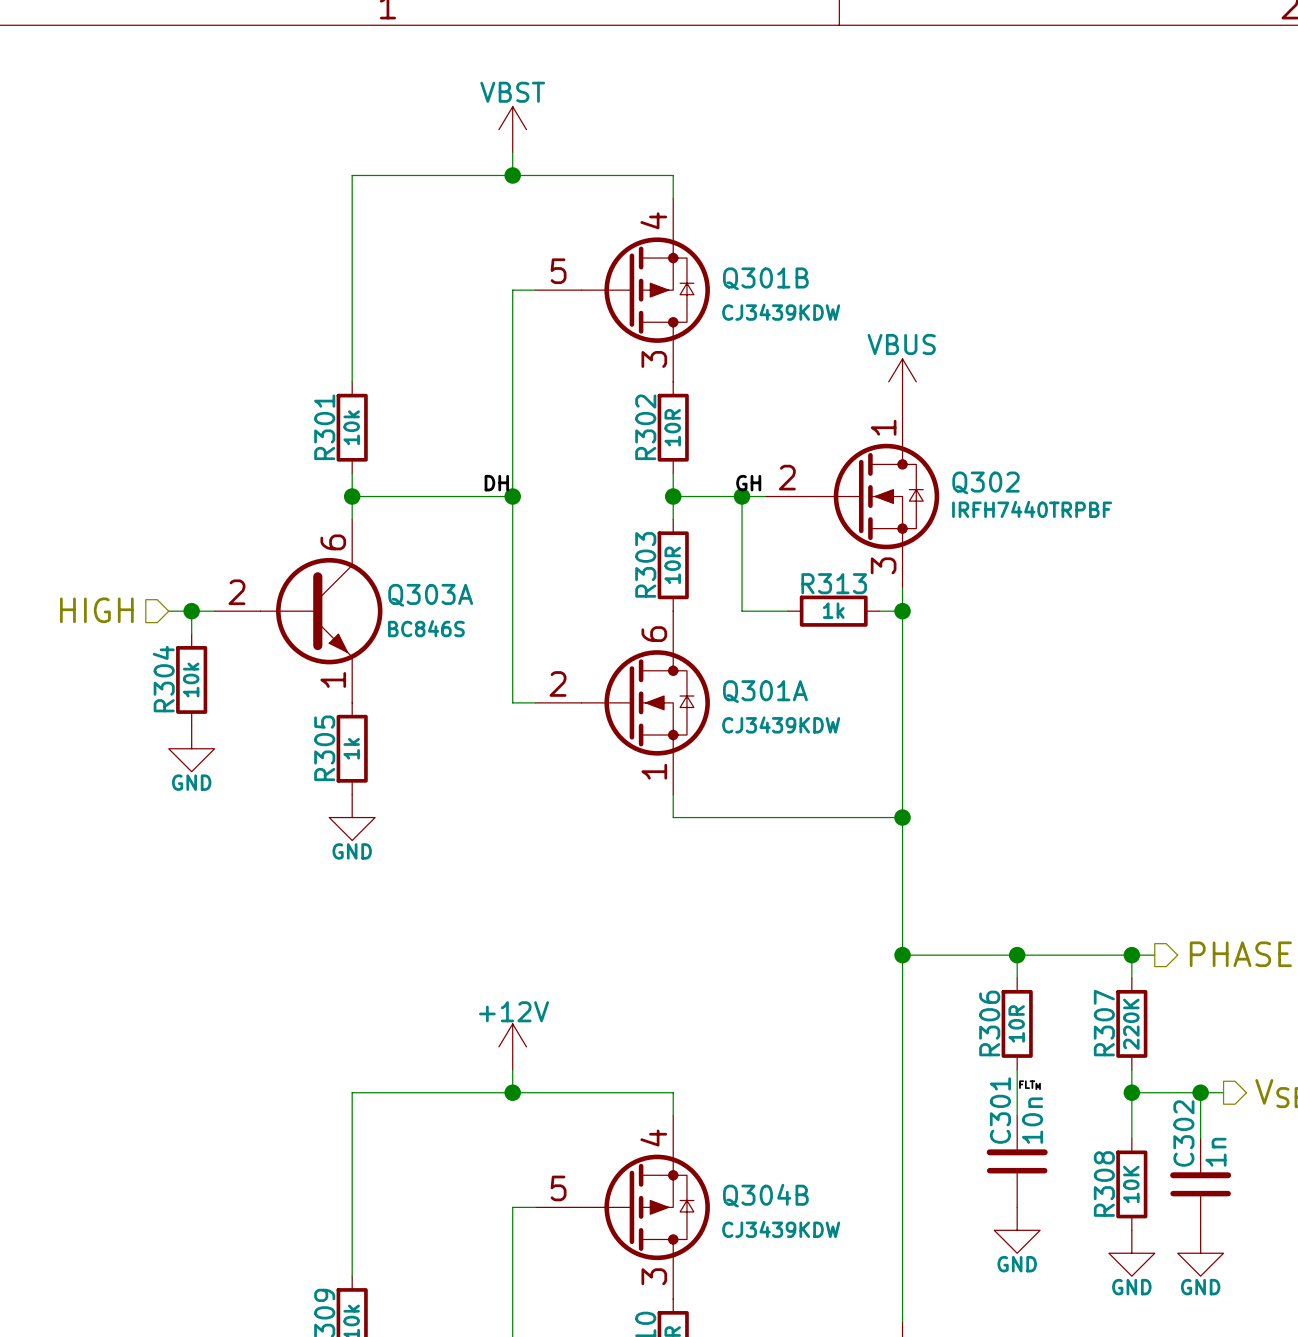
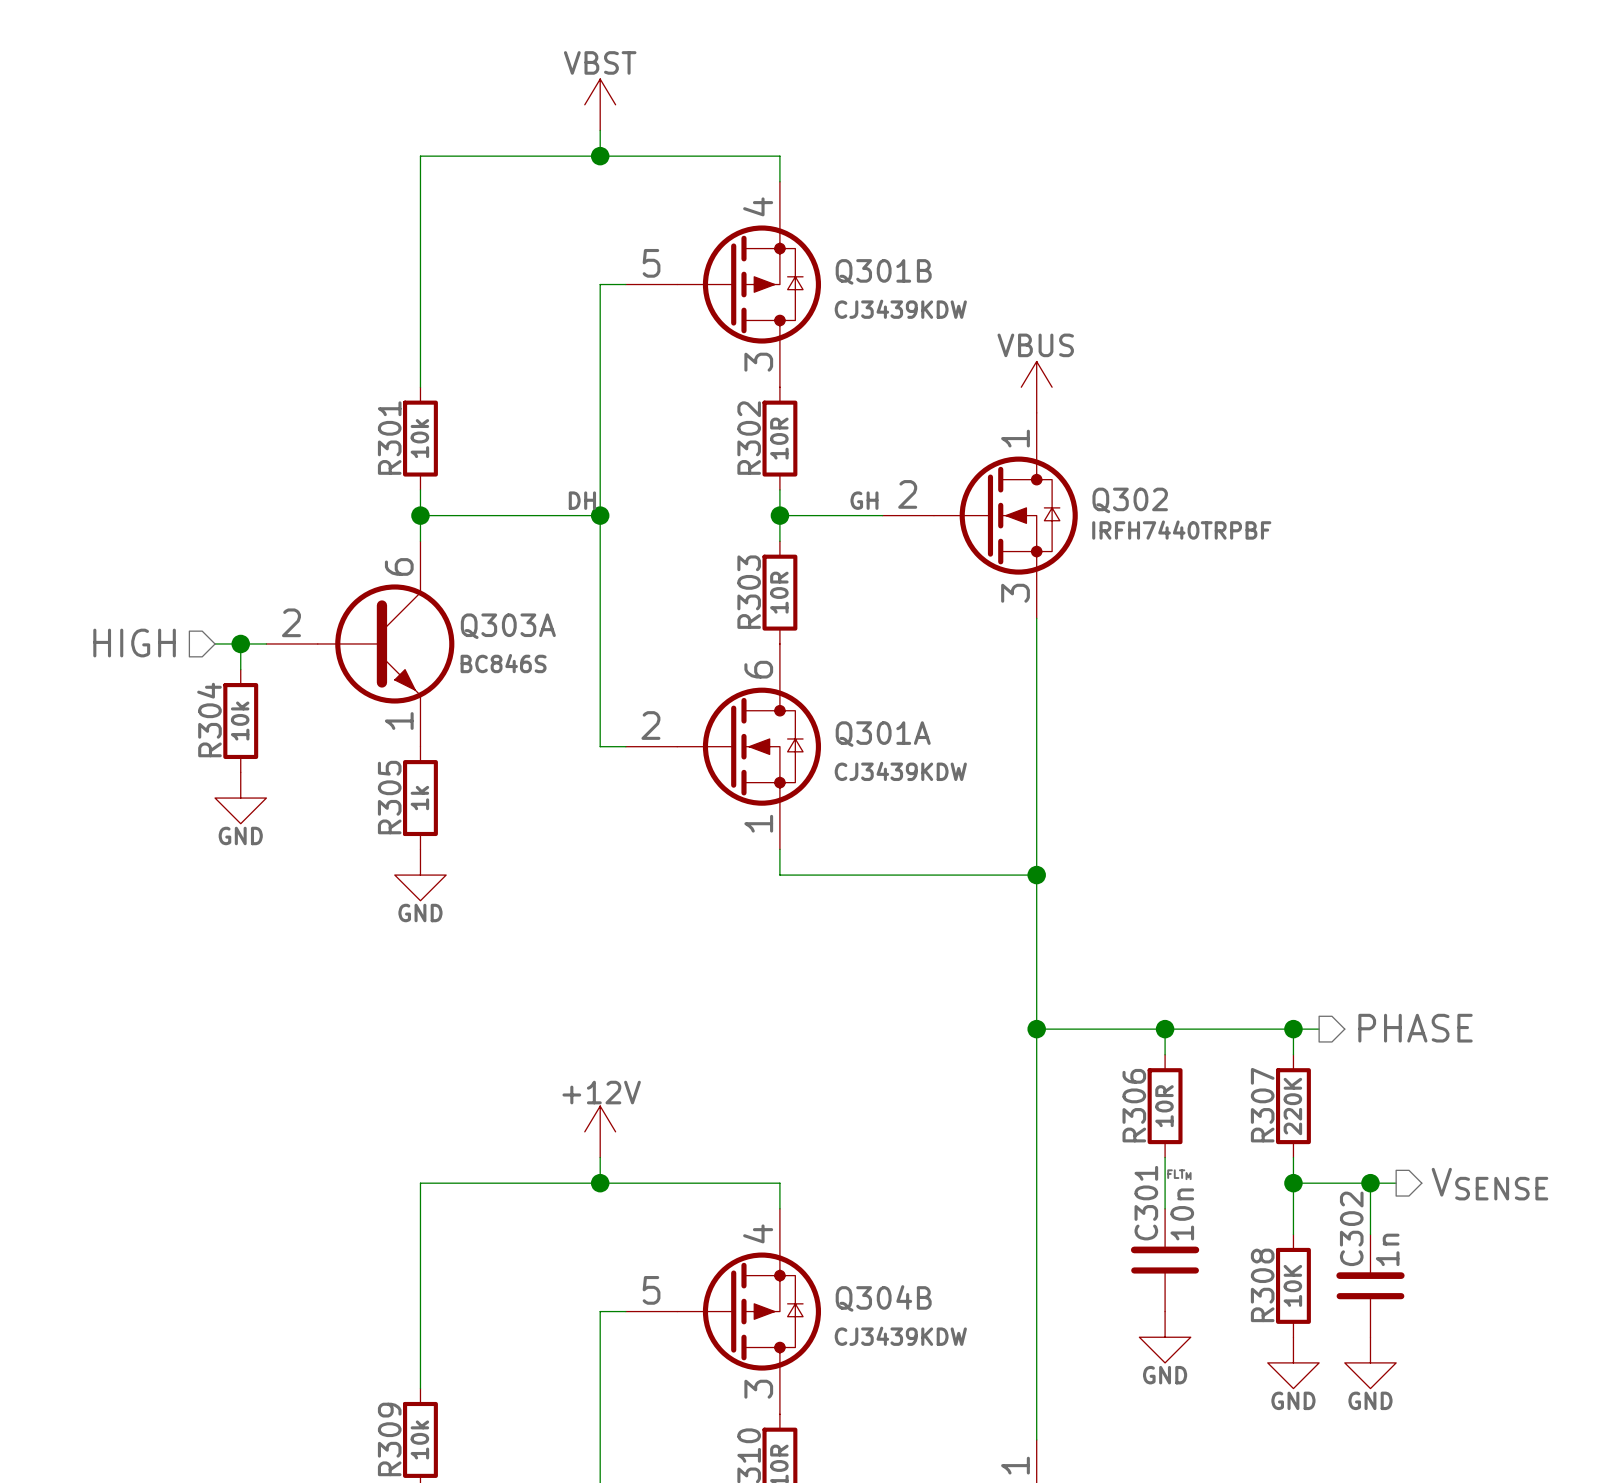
wire: (742, 496) (742, 611) (787, 611) -> none
junction: (742, 496) -> none
R313: 1k (833, 611) -> none
wire: (879, 611) (902, 611) -> none
junction: (902, 611) -> none

